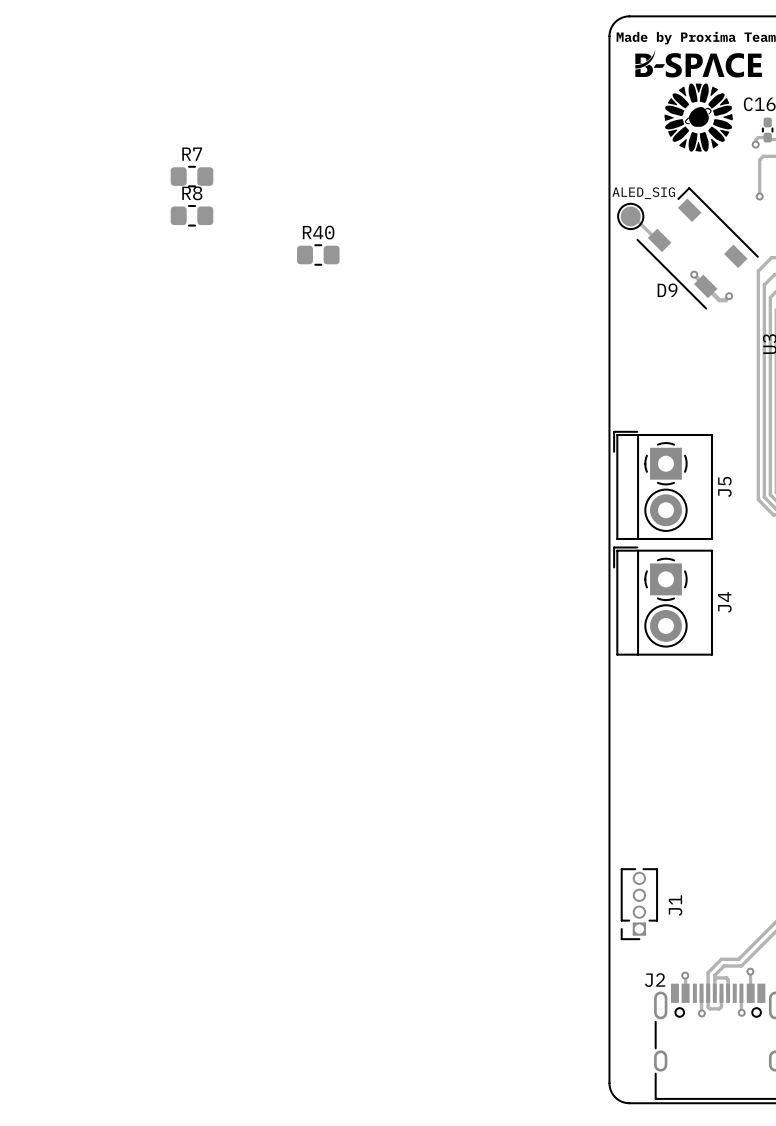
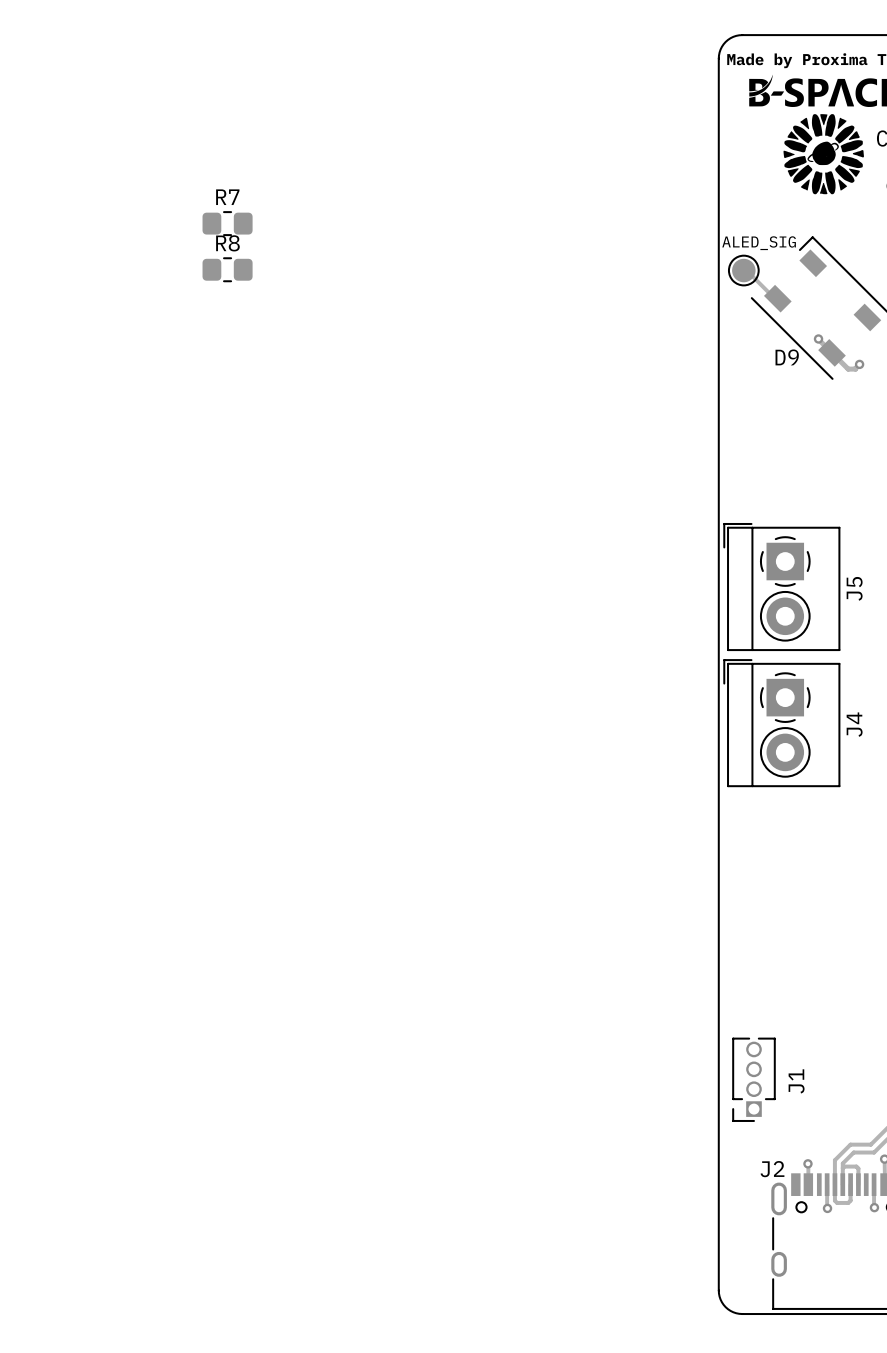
R40: (318, 255) -> none

